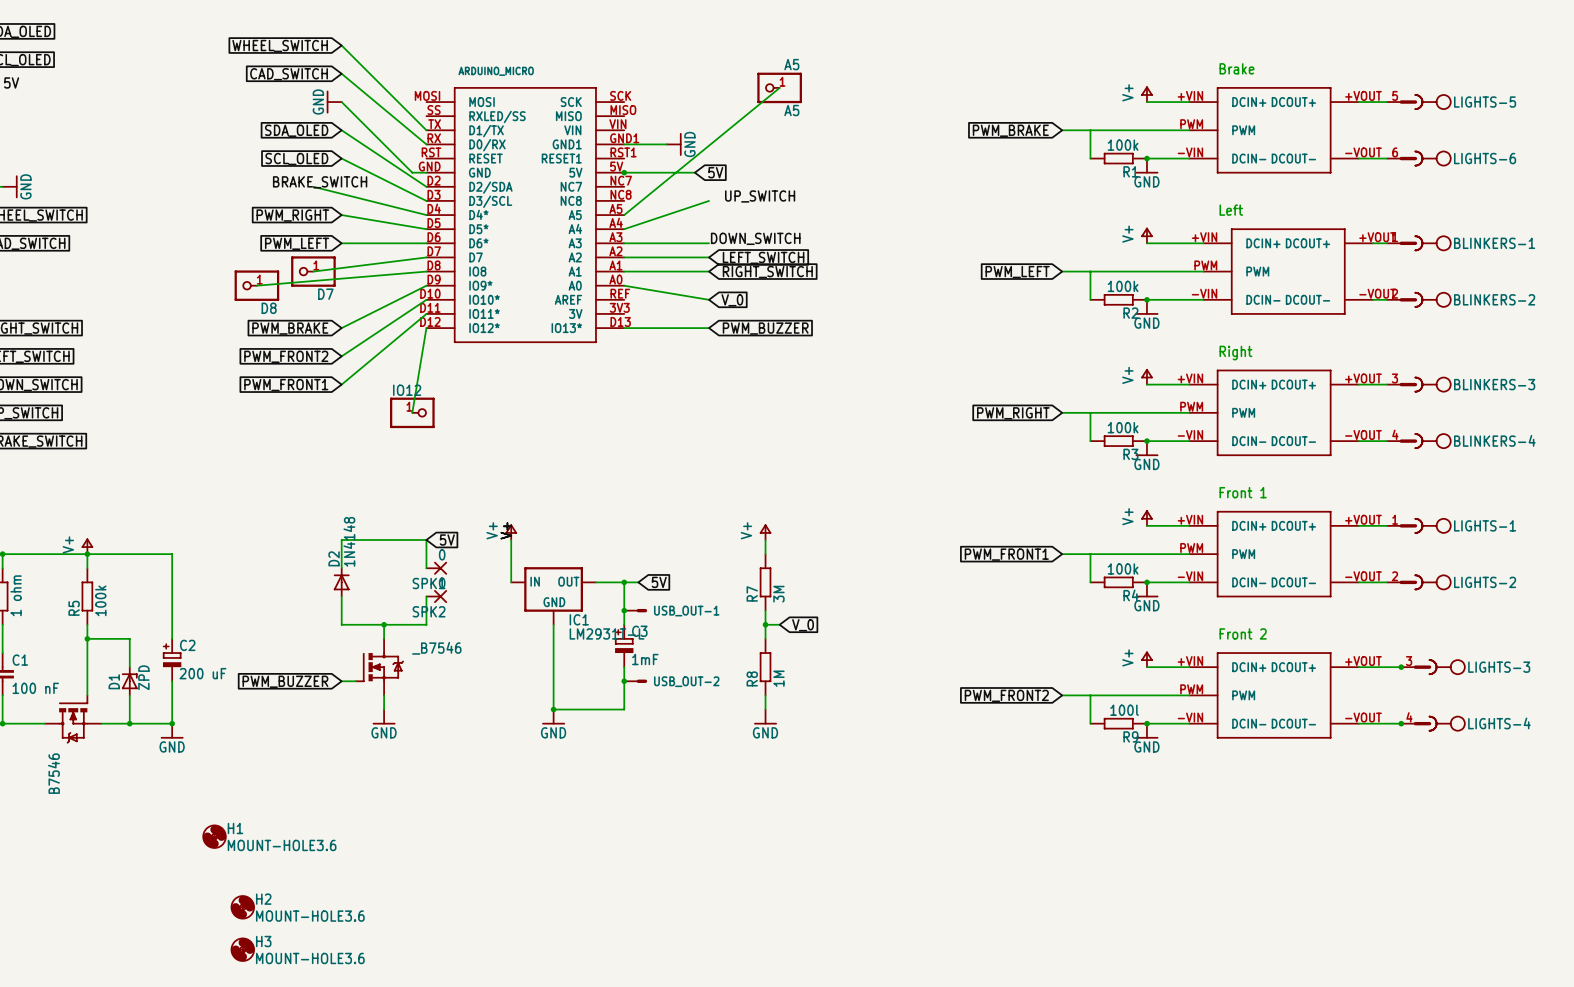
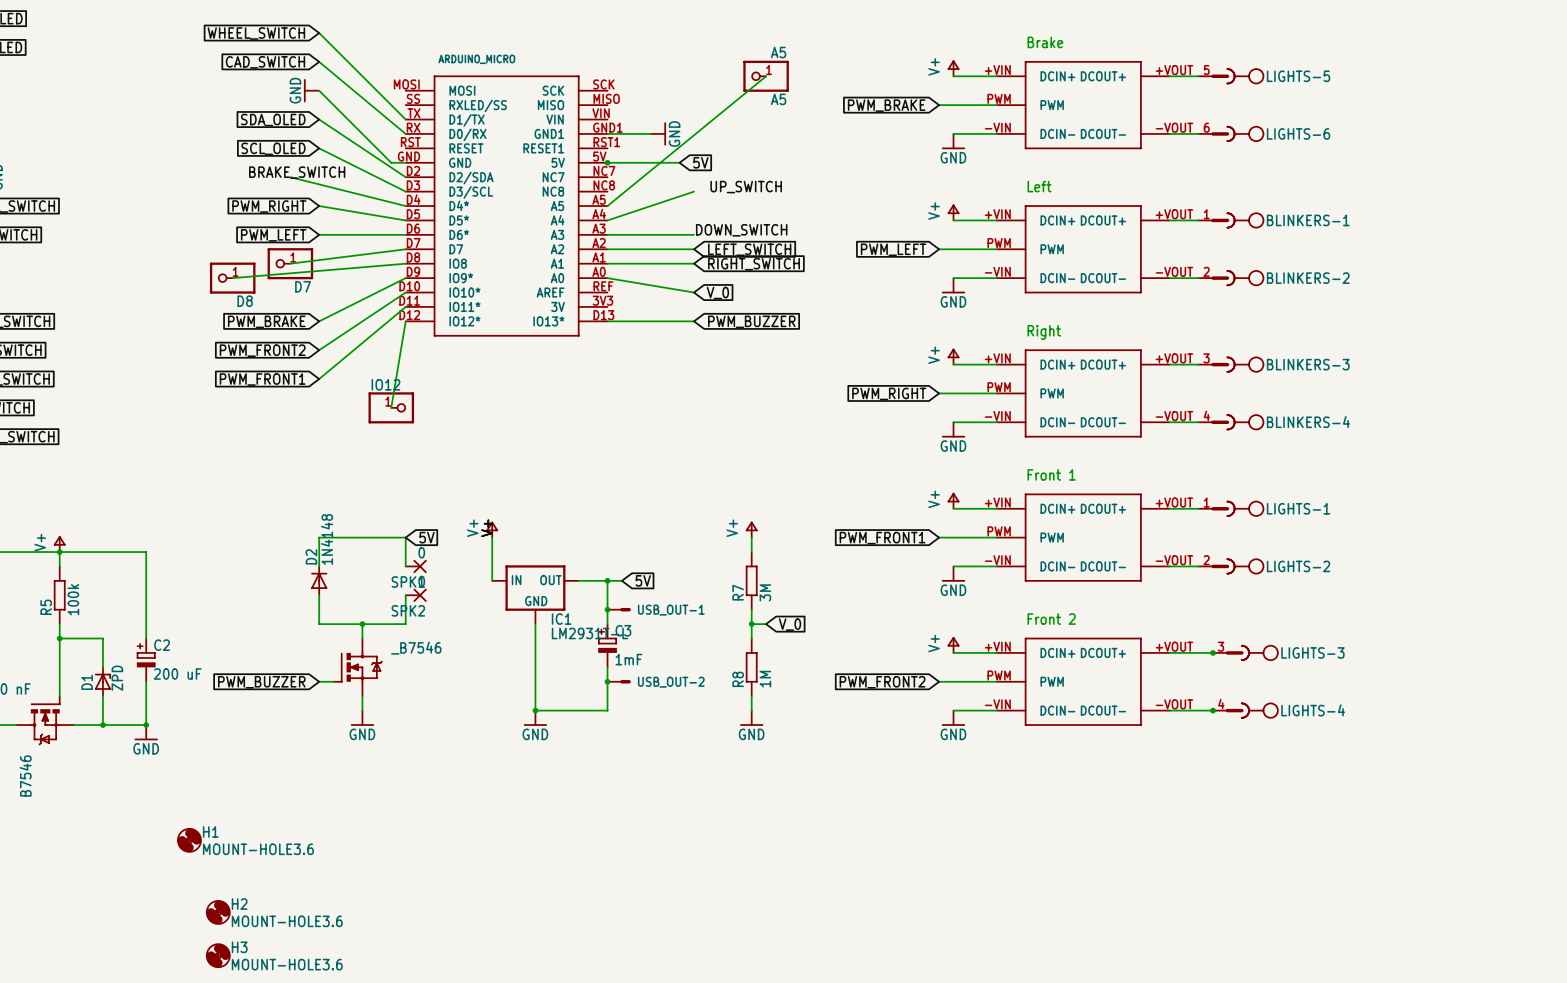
text: none -> Brake (1045, 42)
text: Brake (1237, 68) -> none
power symbol: none -> V+ (953, 68)
wire: none -> (953, 76) (996, 76)
wire: none -> (1169, 76) (1198, 76)
power symbol: V+ (1146, 94) -> none
wire: (1146, 102) (1189, 102) -> none
wire: (1358, 102) (1387, 102) -> none
LIGHTS-5 position: (1419, 102) -> (1231, 76)
wire: none -> (939, 105) (996, 105)
part: none -> (1083, 105)
global label position: PWM_BRAKE (1010, 130) -> PWM_BRAKE (886, 105)
wire: (1062, 130) (1189, 130) -> none
wire: (1090, 130) (1090, 158) -> none
part: (1274, 130) -> none
wire: none -> (953, 133) (996, 133)
wire: none -> (1169, 133) (1198, 133)
power symbol: none -> GND (953, 141)
R1: 100k (1118, 158) -> none
wire: (1146, 158) (1189, 158) -> none
junction: (1146, 158) -> none
wire: (1358, 158) (1387, 158) -> none
LIGHTS-6 position: (1419, 158) -> (1231, 133)
power symbol: GND (1146, 165) -> none
text: none -> Left (1039, 186)
text: Left (1231, 210) -> none
power symbol: none -> V+ (953, 212)
wire: none -> (953, 220) (996, 220)
wire: none -> (1169, 220) (1198, 220)
power symbol: V+ (1146, 235) -> none
wire: (1146, 243) (1203, 243) -> none
wire: (1373, 243) (1387, 243) -> none
BLINKERS-1 position: (1419, 243) -> (1231, 220)
wire: none -> (939, 249) (996, 249)
part: none -> (1083, 249)
wire: (1062, 271) (1203, 271) -> none
wire: (1090, 271) (1090, 299) -> none
part: (1288, 271) -> none
global label position: PWM_LEFT (1017, 272) -> PWM_LEFT (893, 249)
wire: none -> (953, 278) (996, 278)
wire: none -> (1169, 278) (1198, 278)
power symbol: none -> GND (953, 285)
R2: 100k (1118, 299) -> none
wire: (1146, 299) (1203, 299) -> none
junction: (1146, 299) -> none
wire: (1373, 299) (1387, 299) -> none
BLINKERS-2 position: (1419, 299) -> (1231, 278)
power symbol: GND (1146, 307) -> none
text: none -> Right (1044, 332)
text: Right (1235, 353) -> none
power symbol: none -> V+ (953, 356)
wire: none -> (953, 364) (996, 364)
wire: none -> (1169, 364) (1198, 364)
power symbol: V+ (1146, 376) -> none
wire: (1146, 384) (1189, 384) -> none
wire: (1358, 384) (1387, 384) -> none
BLINKERS-3 position: (1419, 384) -> (1231, 364)
wire: none -> (939, 393) (996, 393)
part: none -> (1083, 393)
wire: (1062, 412) (1189, 412) -> none
wire: (1090, 412) (1090, 441) -> none
part: (1274, 412) -> none
global label position: PWM_RIGHT (1013, 413) -> PWM_RIGHT (889, 393)
wire: none -> (953, 422) (996, 422)
wire: none -> (1169, 422) (1198, 422)
power symbol: none -> GND (953, 429)
R3: 100k (1118, 441) -> none
wire: (1146, 441) (1189, 441) -> none
junction: (1146, 441) -> none
wire: (1358, 441) (1387, 441) -> none
BLINKERS-4 position: (1419, 441) -> (1231, 422)
power symbol: GND (1146, 448) -> none
text: none -> Front 1 (1051, 474)
text: Front 1 (1243, 492) -> none
power symbol: none -> V+ (953, 500)
wire: none -> (953, 508) (996, 508)
wire: none -> (1169, 508) (1198, 508)
power symbol: V+ (1146, 518) -> none
wire: (1146, 525) (1189, 525) -> none
wire: (1358, 525) (1387, 525) -> none
LIGHTS-1 position: (1419, 525) -> (1231, 508)
wire: none -> (939, 537) (996, 537)
part: none -> (1083, 537)
global label position: PWM_FRONT1 (1006, 554) -> PWM_FRONT1 (882, 538)
wire: (1062, 554) (1189, 554) -> none
wire: (1090, 554) (1090, 582) -> none
part: (1274, 554) -> none
wire: none -> (953, 566) (996, 566)
wire: none -> (1169, 566) (1198, 566)
power symbol: none -> GND (953, 574)
R4: 100k (1118, 582) -> none
wire: (1146, 582) (1189, 582) -> none
junction: (1146, 582) -> none
wire: (1358, 582) (1387, 582) -> none
LIGHTS-2 position: (1419, 582) -> (1231, 566)
power symbol: GND (1146, 589) -> none
text: none -> Front 2 (1051, 619)
text: Front 2 (1243, 633) -> none
power symbol: none -> V+ (953, 645)
wire: none -> (953, 652) (996, 652)
junction: none -> (1213, 652)
power symbol: V+ (1146, 659) -> none
wire: (1146, 667) (1189, 667) -> (1169, 652) (1213, 652)
wire: (1358, 667) (1401, 667) -> none
junction: (1401, 667) -> none
LIGHTS-3 position: (1433, 667) -> (1245, 652)
wire: none -> (939, 681) (996, 681)
part: none -> (1083, 681)
global label position: PWM_FRONT2 (1006, 695) -> PWM_FRONT2 (882, 682)
wire: (1062, 695) (1189, 695) -> none
wire: (1090, 695) (1090, 723) -> none
part: (1274, 695) -> none
wire: none -> (953, 710) (996, 710)
junction: none -> (1213, 710)
power symbol: none -> GND (953, 718)
R9: 100l (1118, 723) -> none
wire: (1146, 723) (1189, 723) -> (1169, 710) (1213, 710)
junction: (1146, 723) -> none
wire: (1358, 723) (1401, 723) -> none
junction: (1401, 723) -> none
LIGHTS-4 position: (1433, 723) -> (1245, 710)
power symbol: GND (1146, 731) -> none

